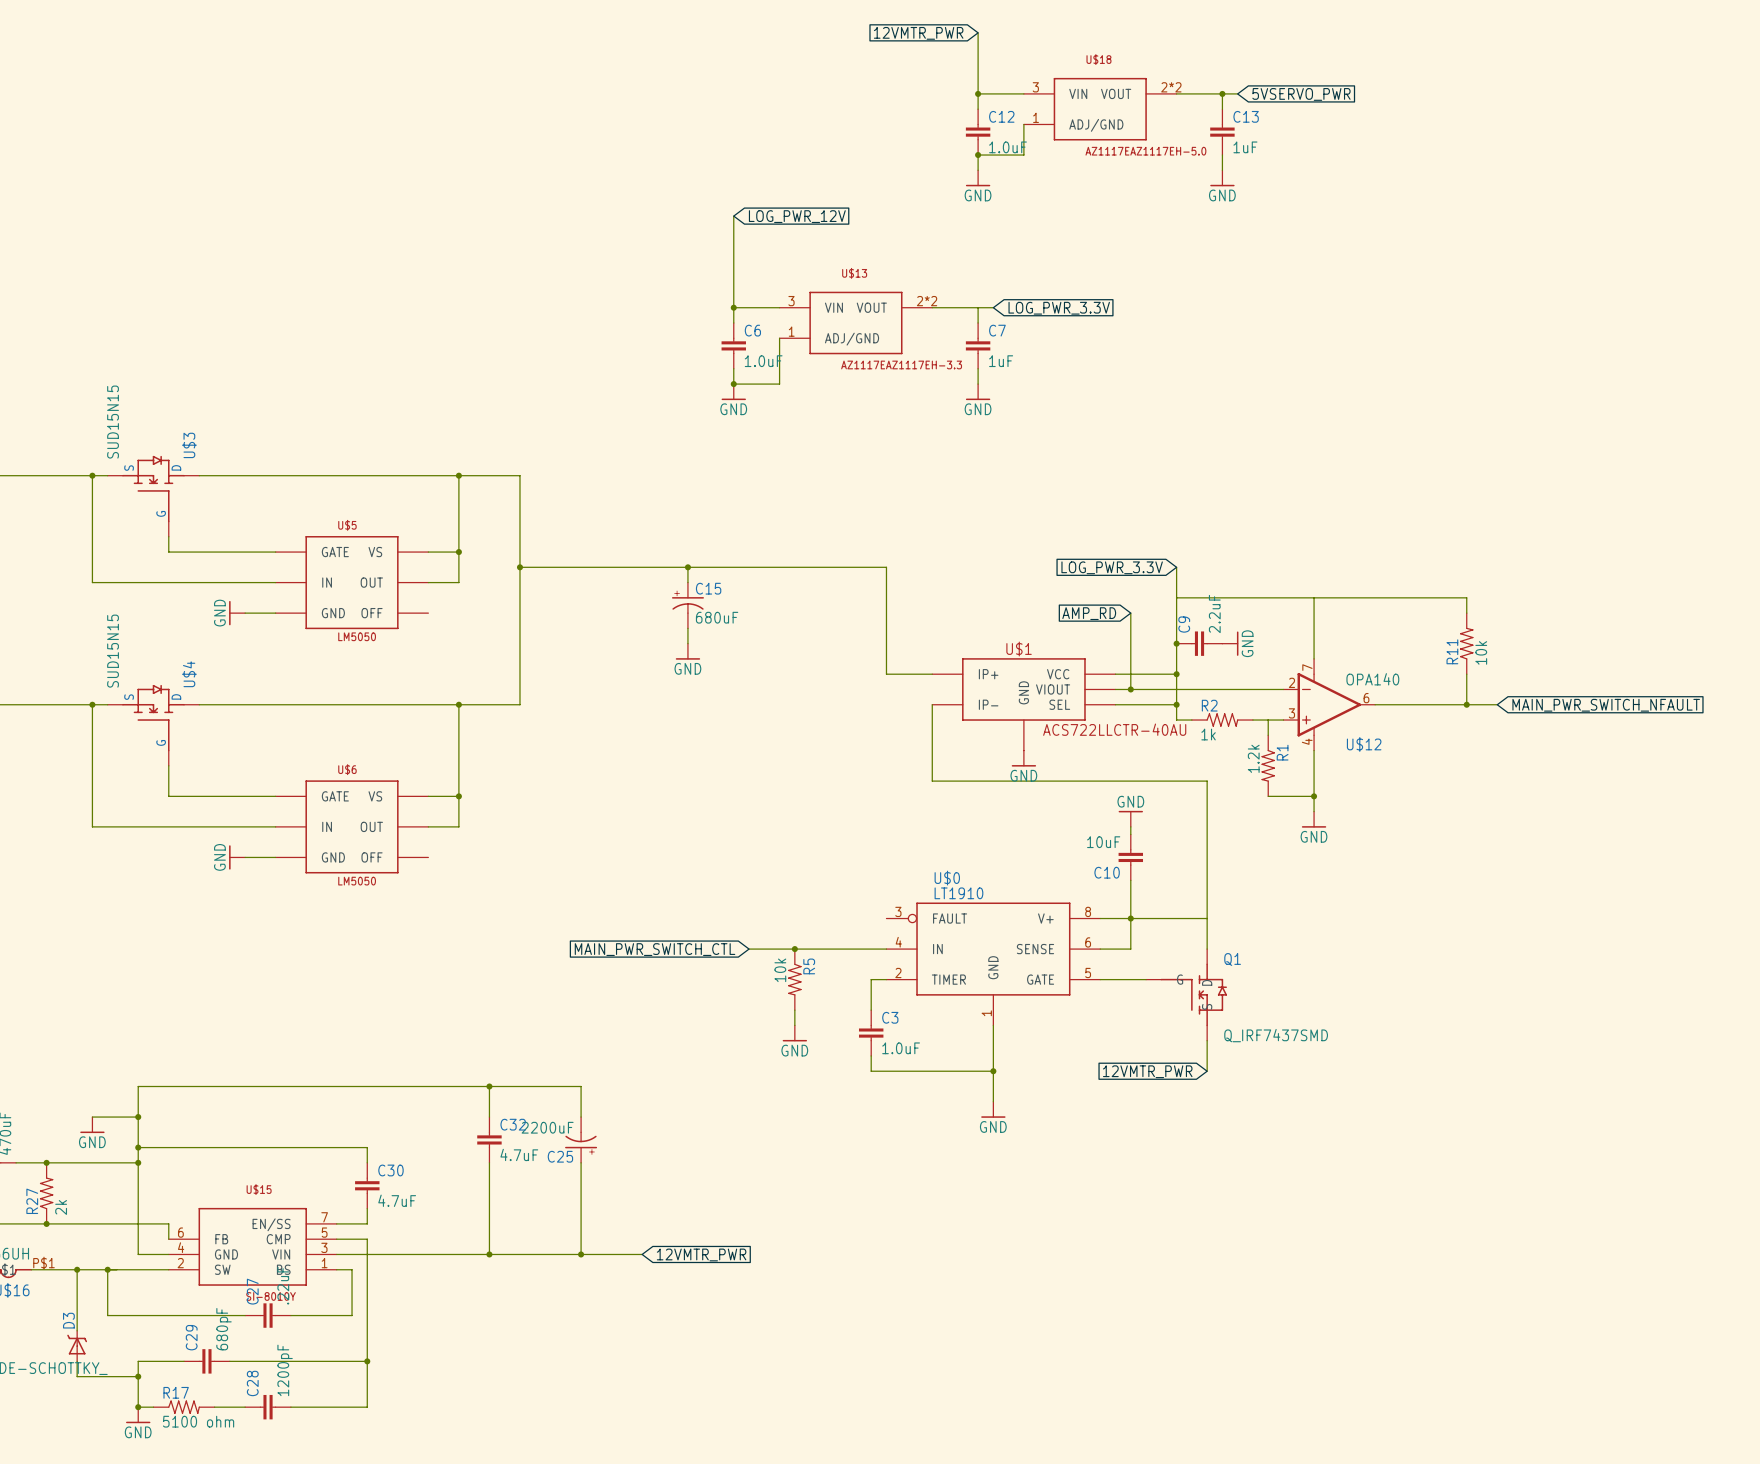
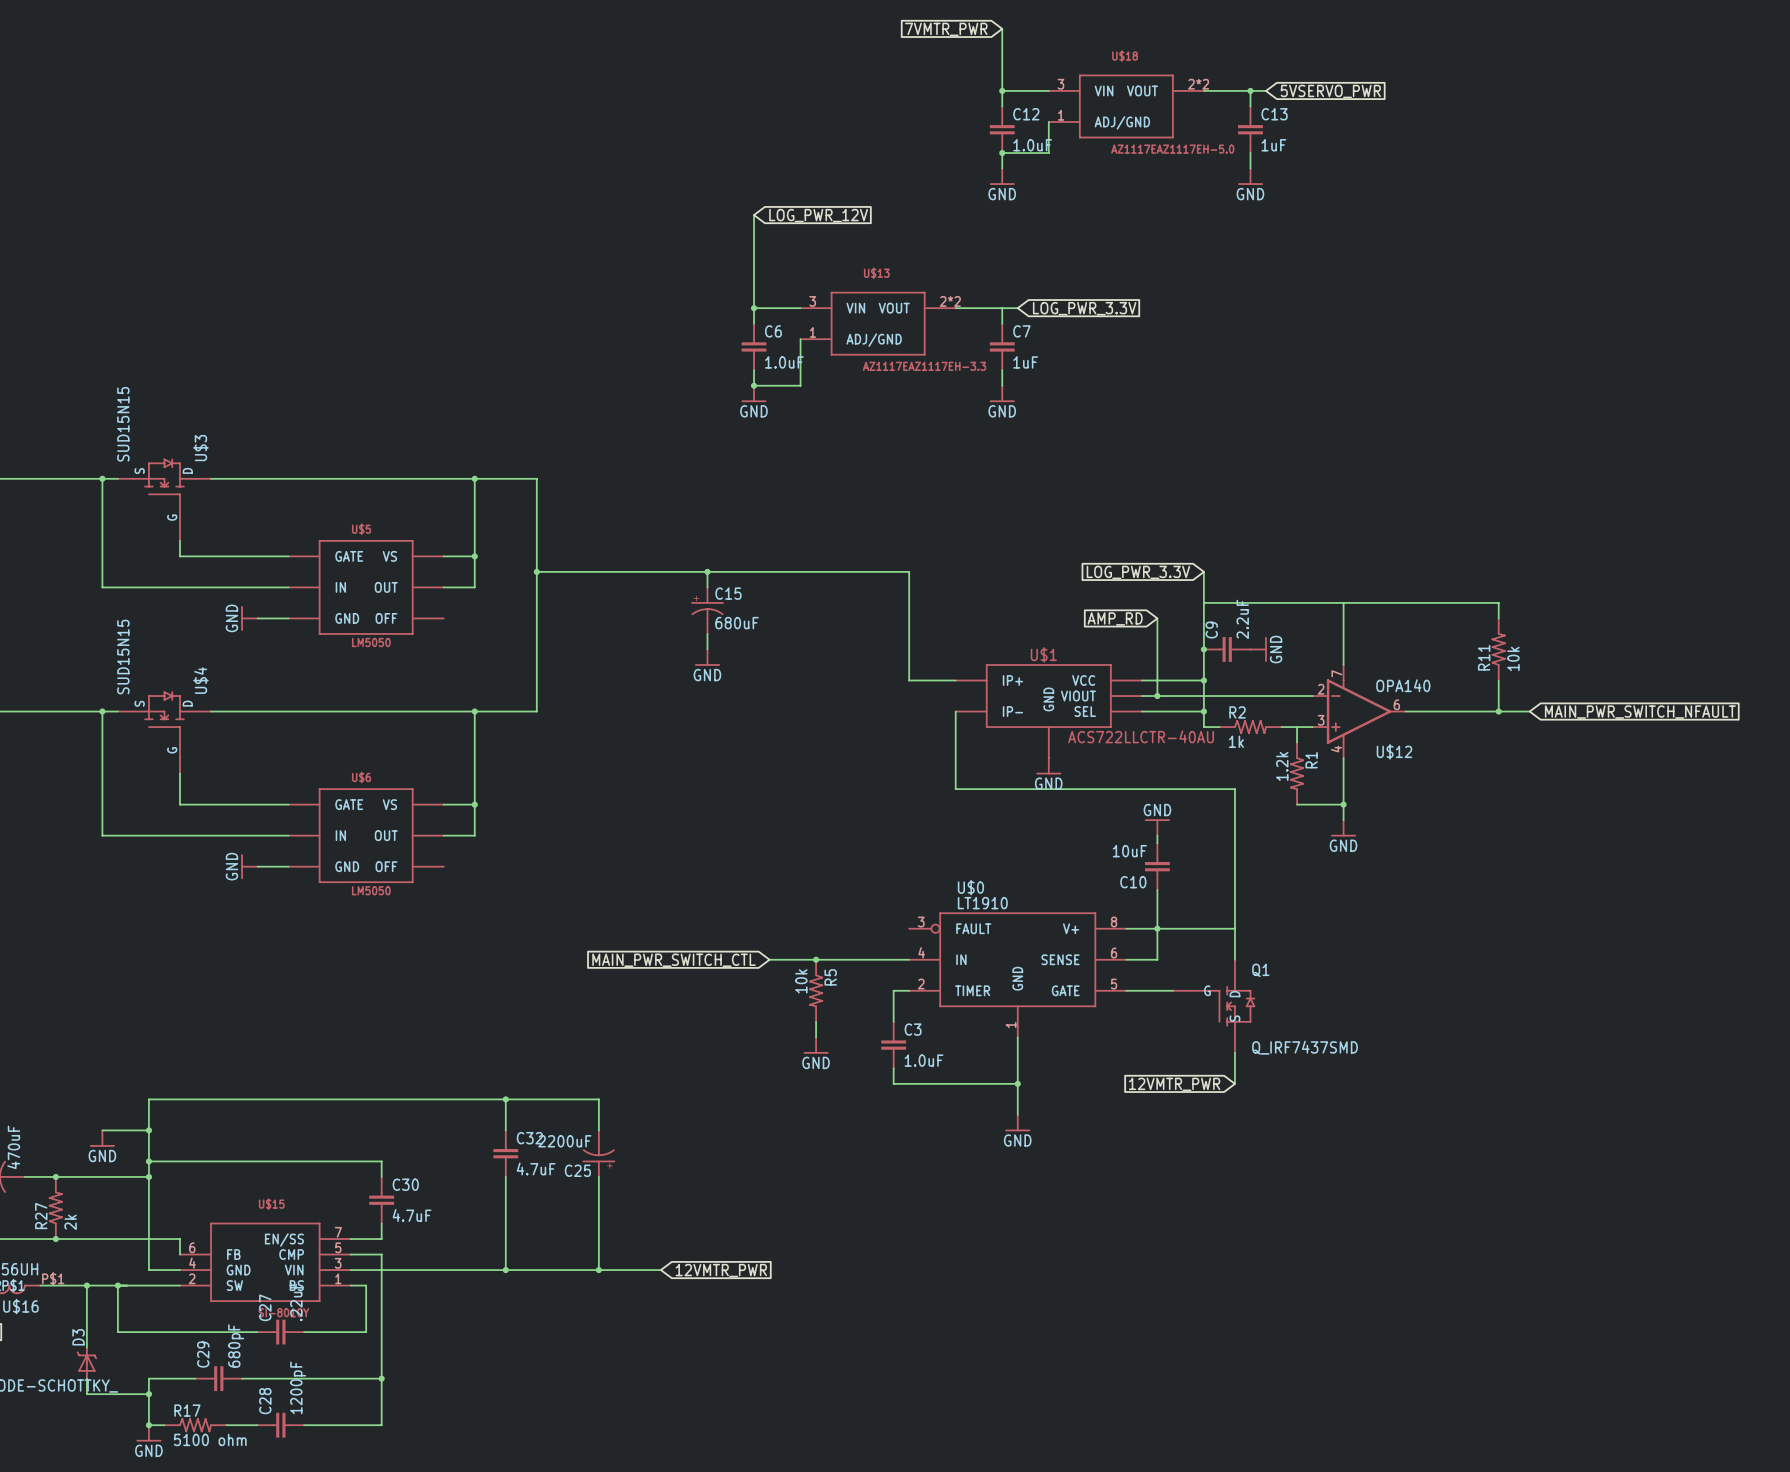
global label: 12VMTR_PWR (918, 33) -> 7VMTR_PWR (946, 29)

